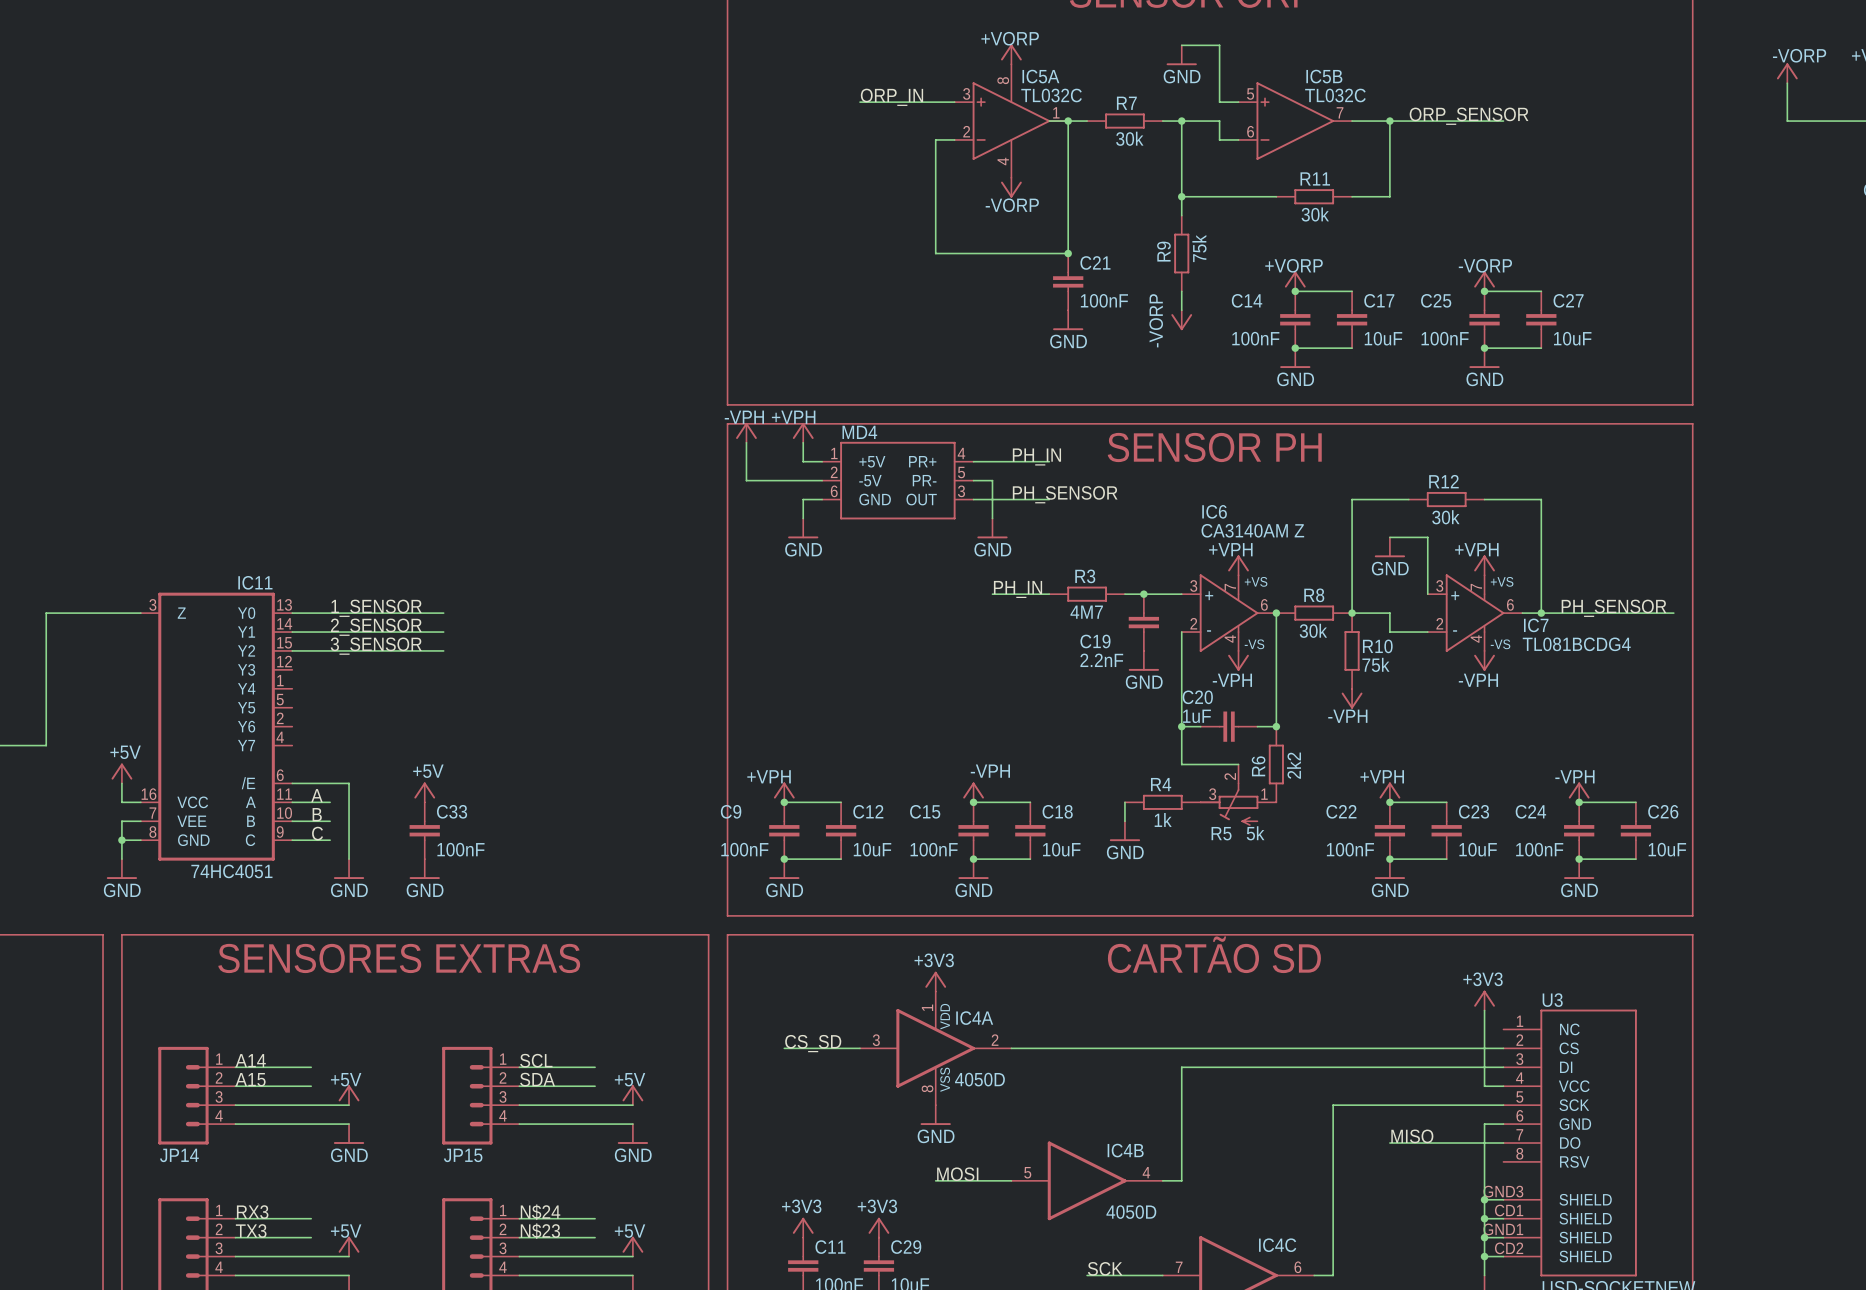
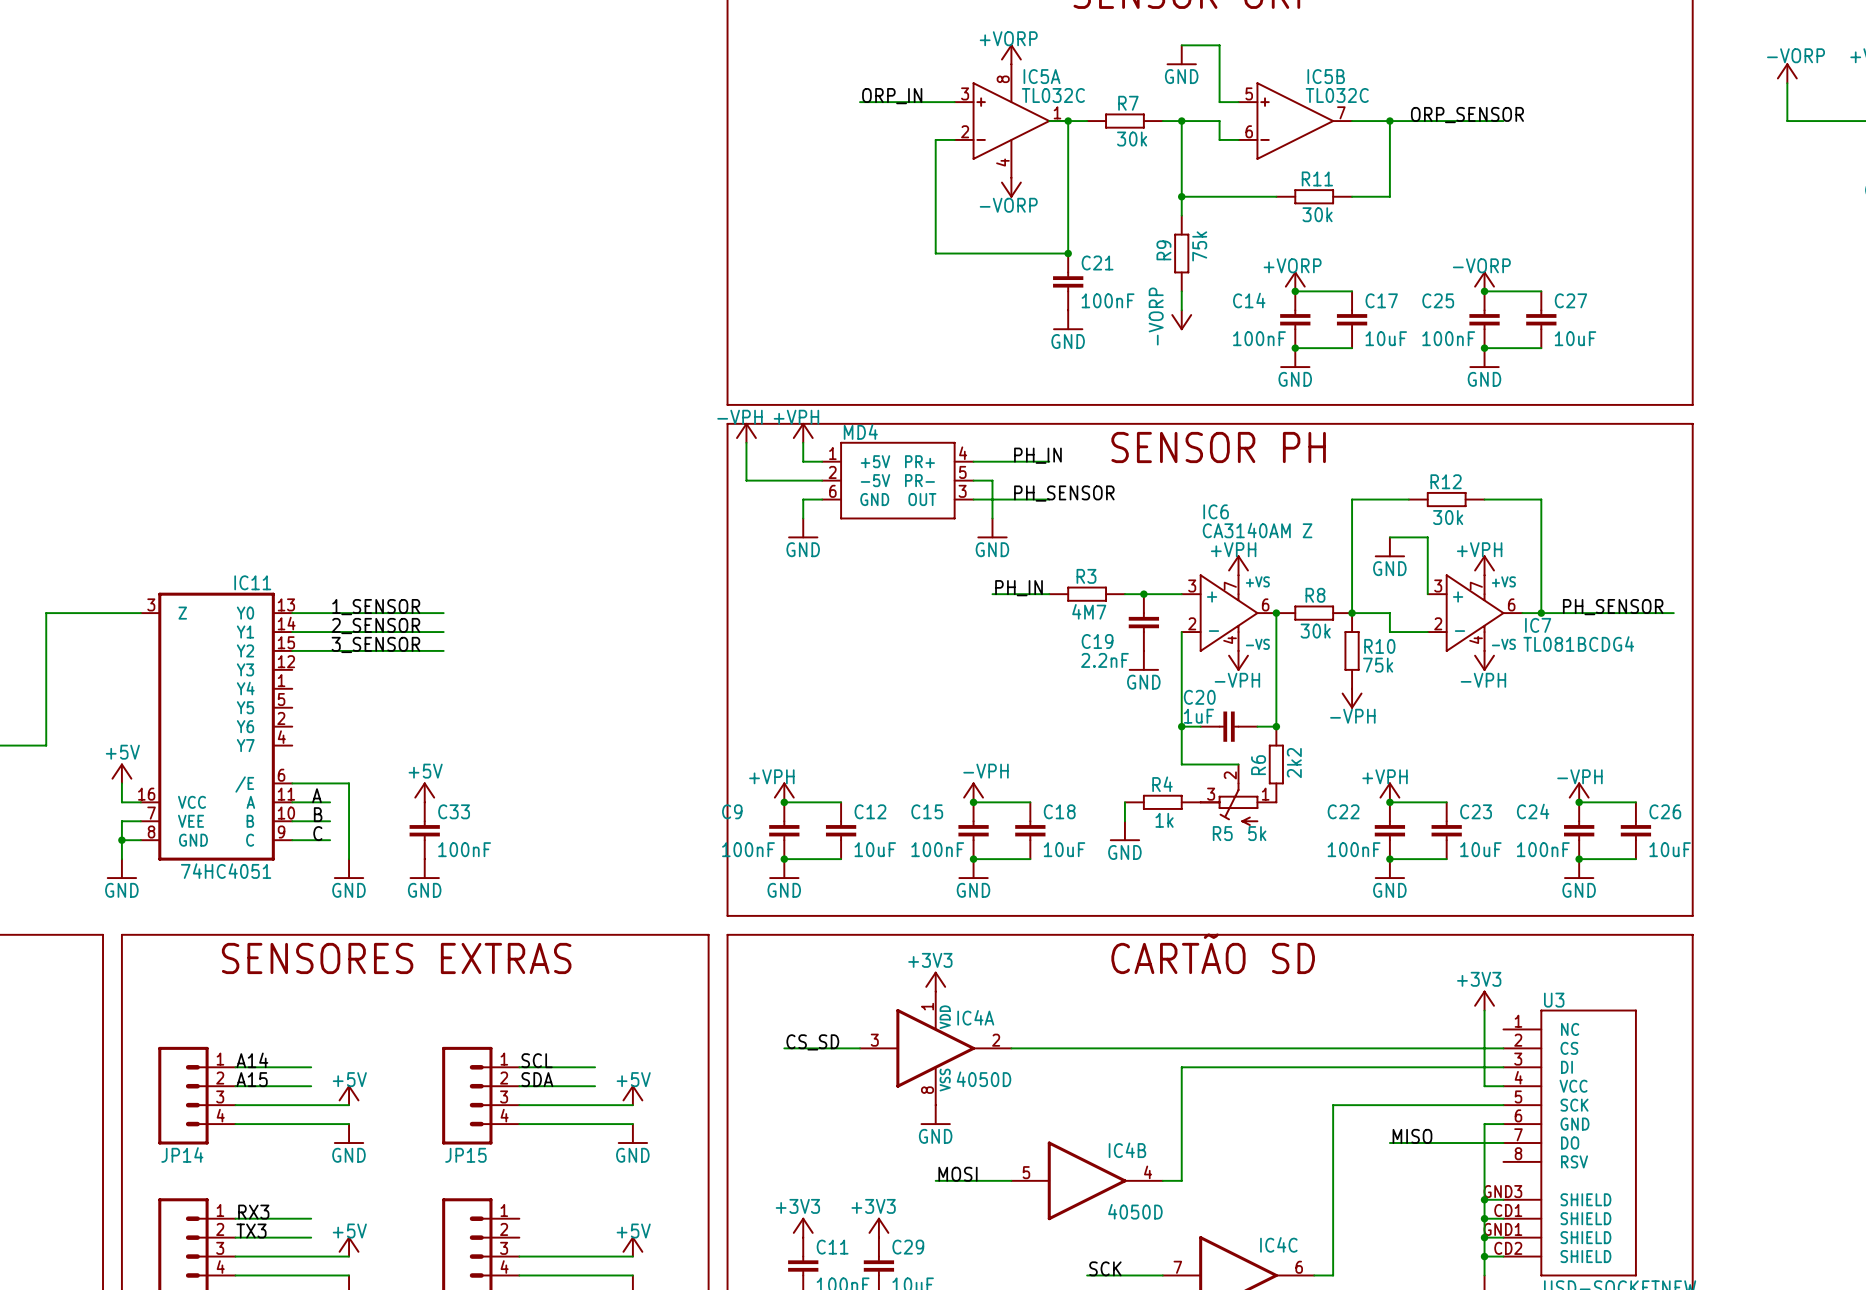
label: N$24 (540, 1212) -> none
wire: (519, 1218) (595, 1218) -> none
label: N$23 (540, 1231) -> none
wire: (519, 1237) (595, 1237) -> none

